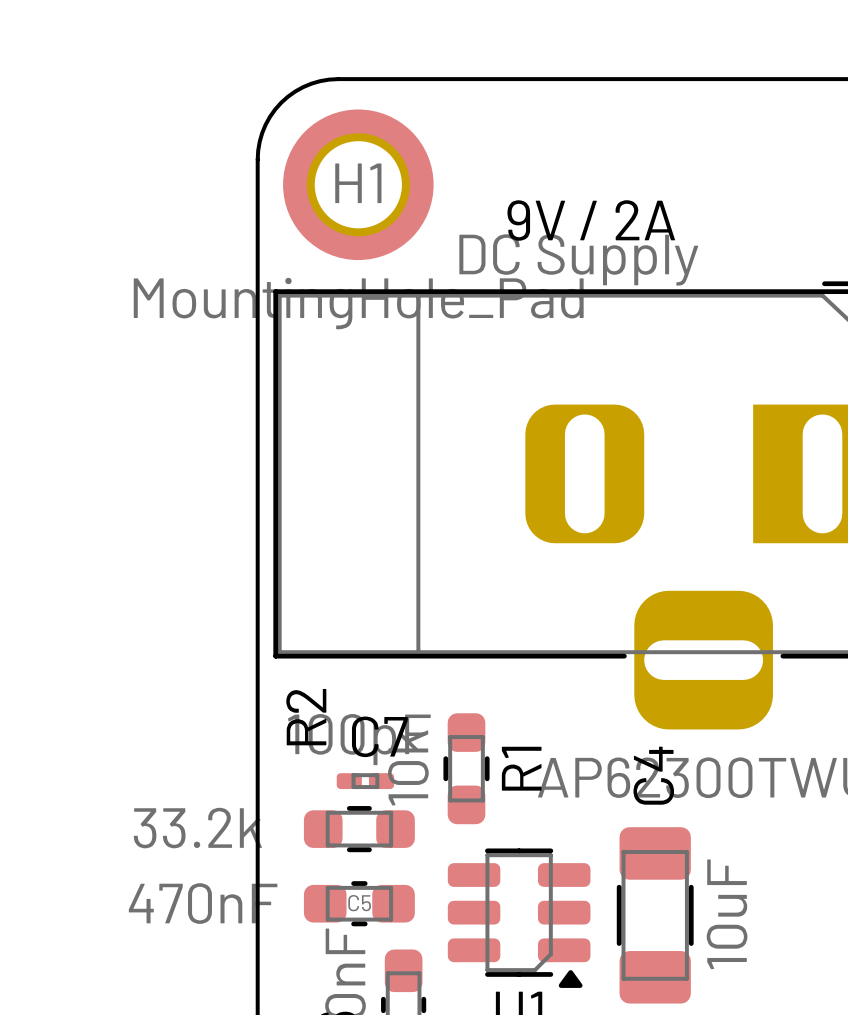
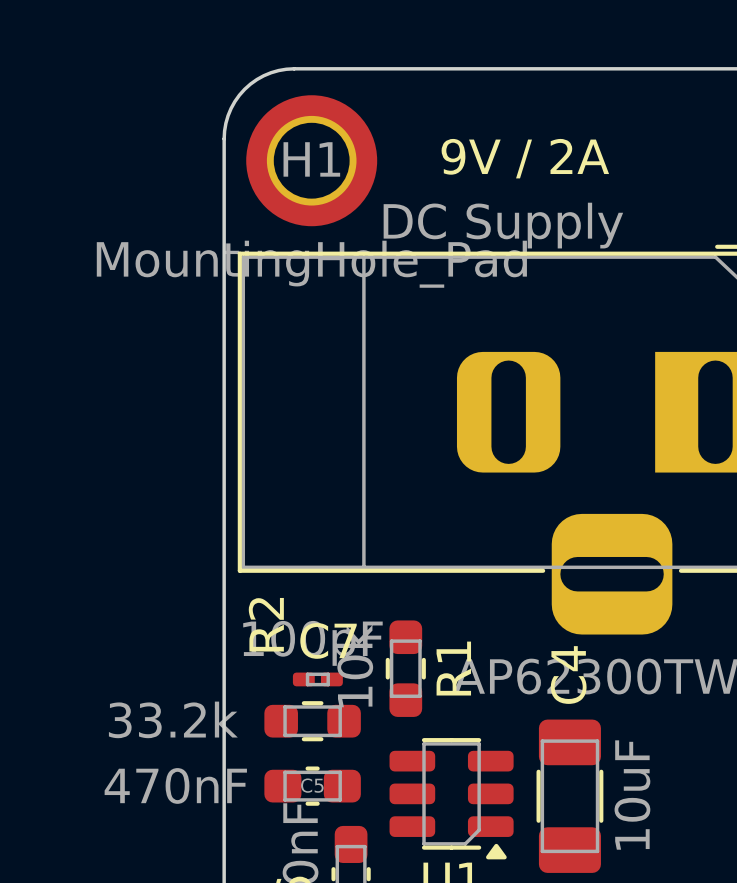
text position: 9V / 2A (591, 220) -> 9V / 2A (525, 158)

